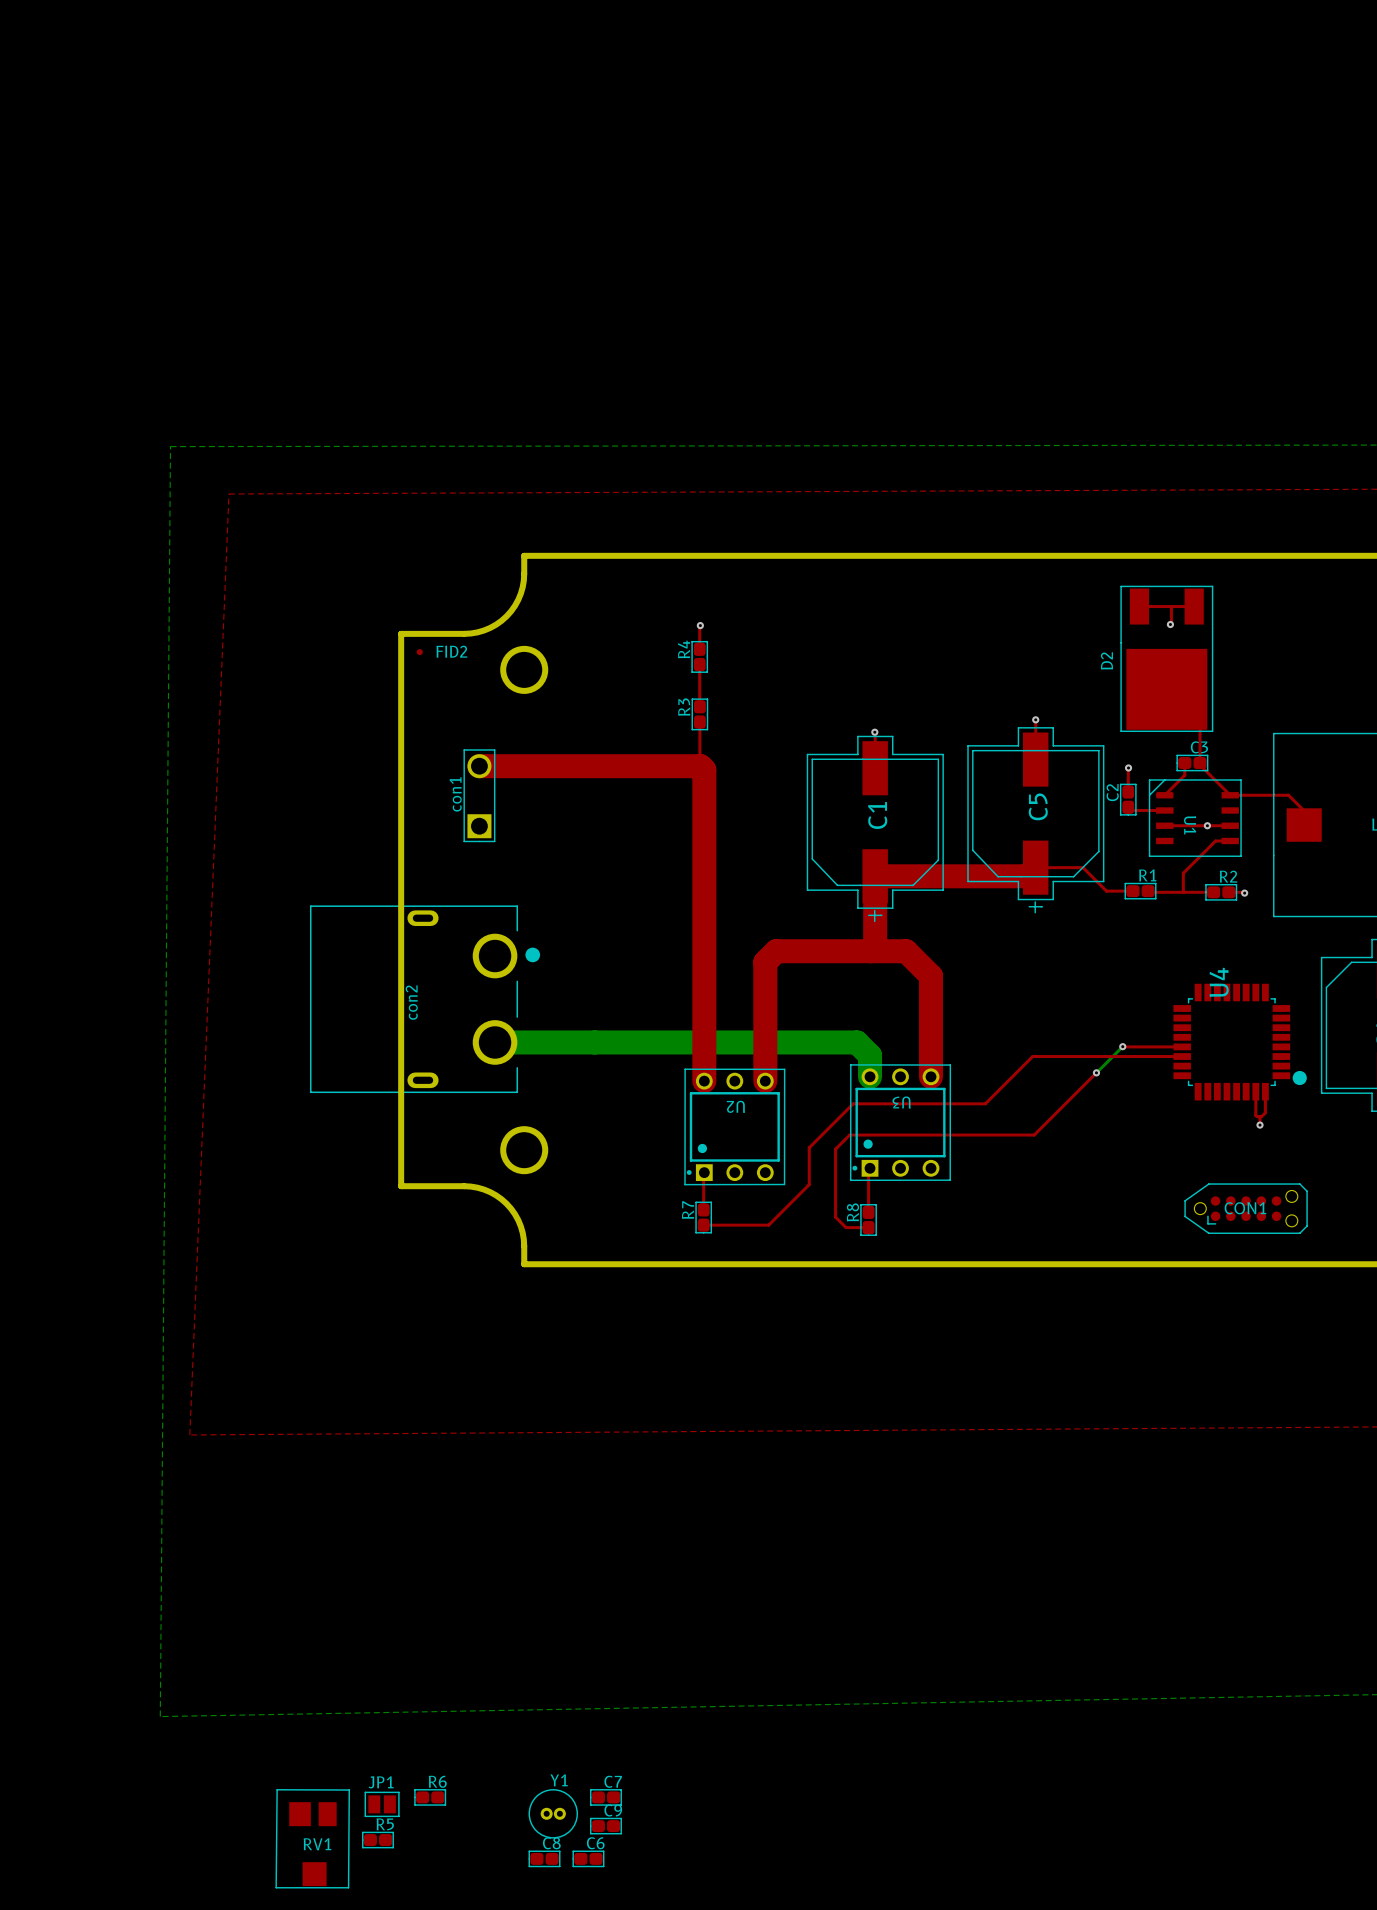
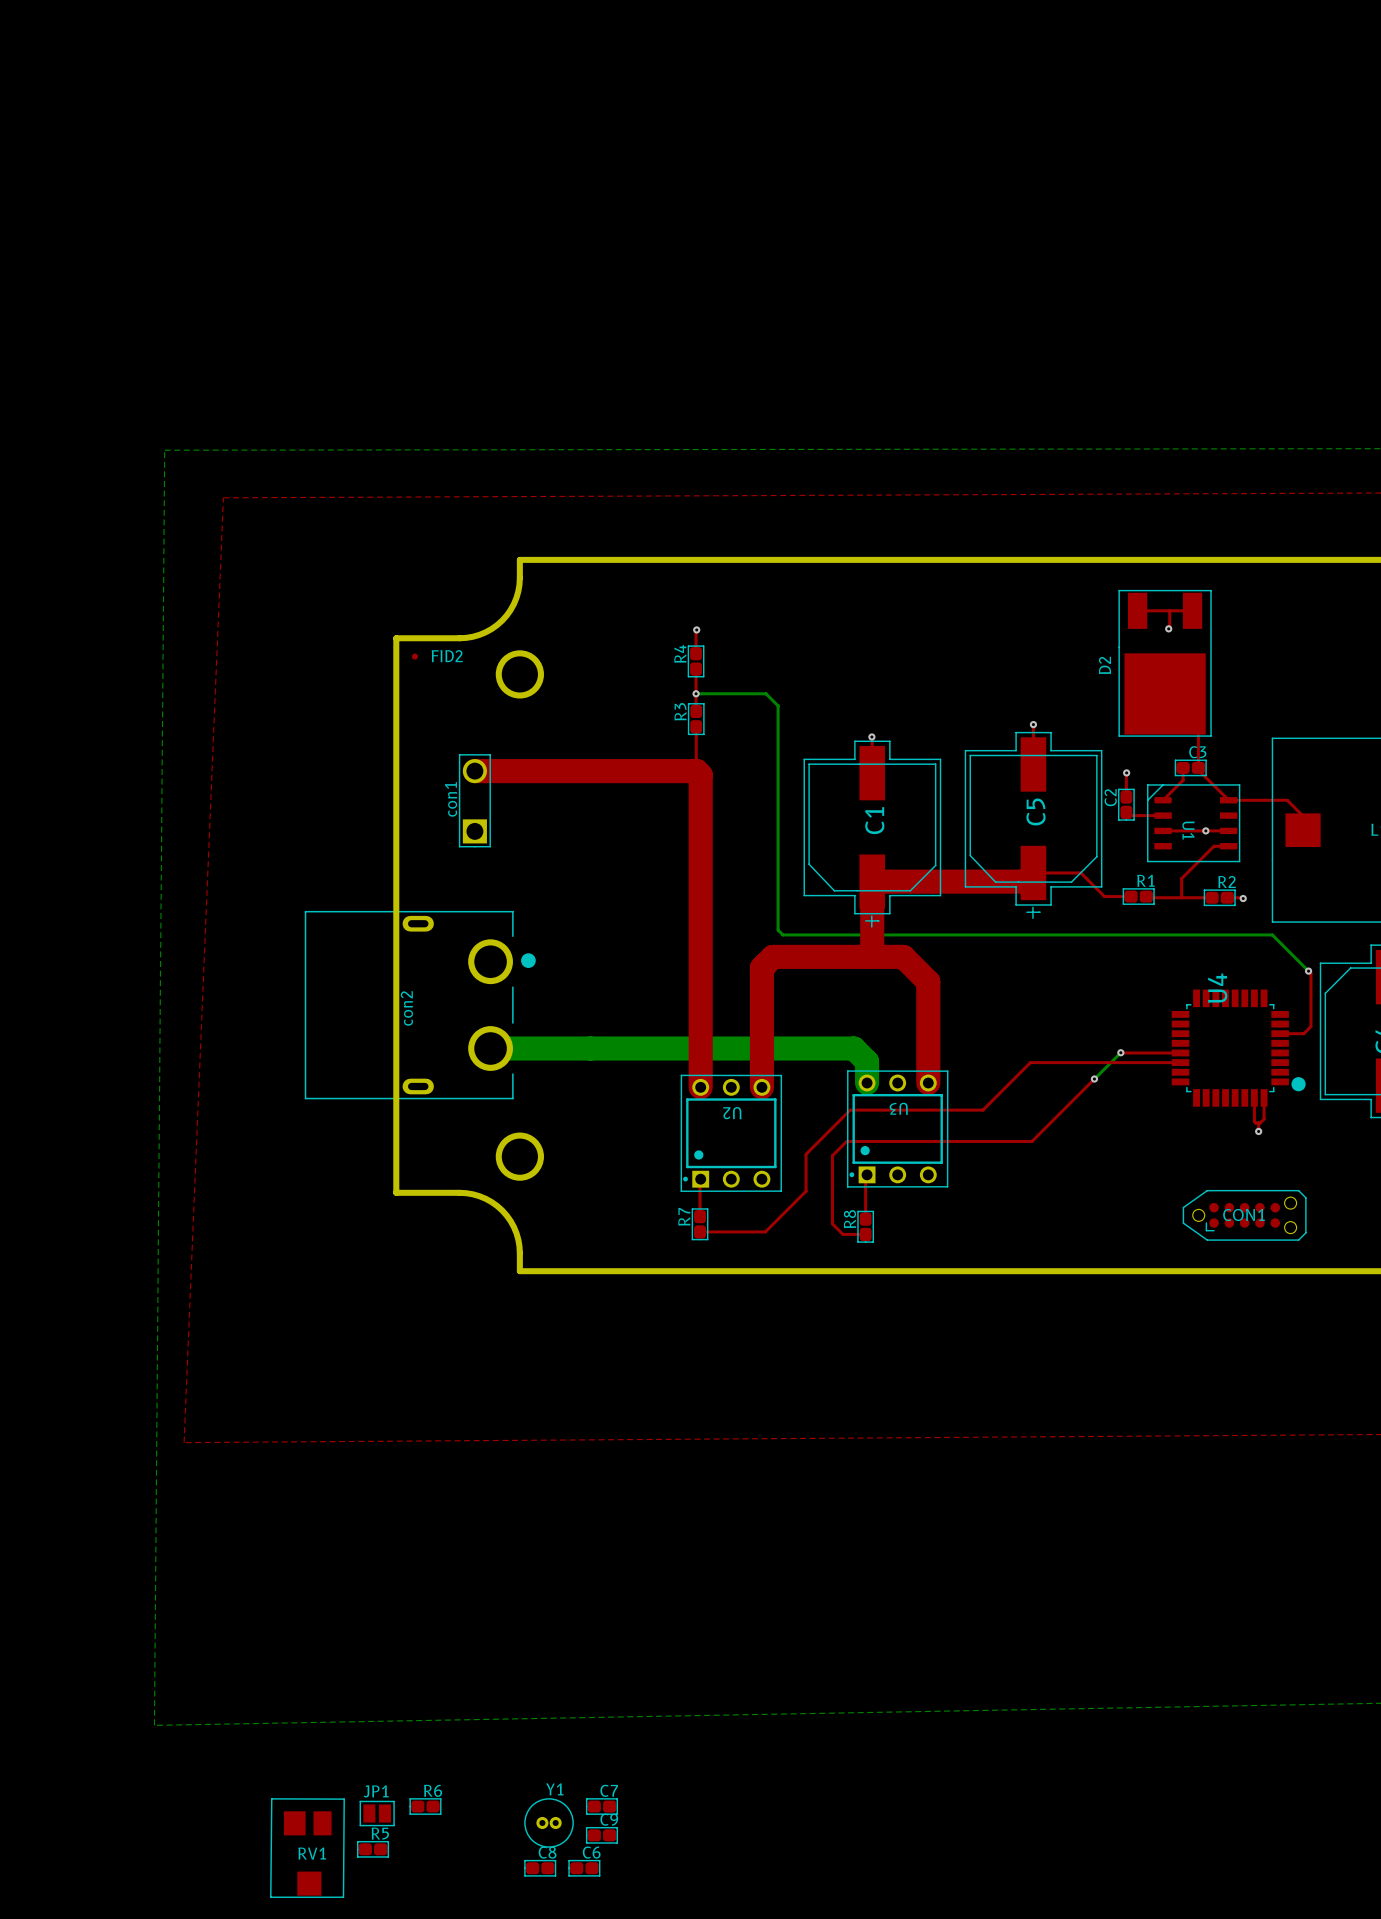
bottom track: none -> (696, 693) (765, 693) (778, 705) (778, 930) (782, 934) (1272, 934) (1308, 971)
via: none -> (696, 693)
top track: none -> (1308, 971) (1310, 973) (1310, 1026) (1303, 1033) (1280, 1033)
via: none -> (1308, 971)

